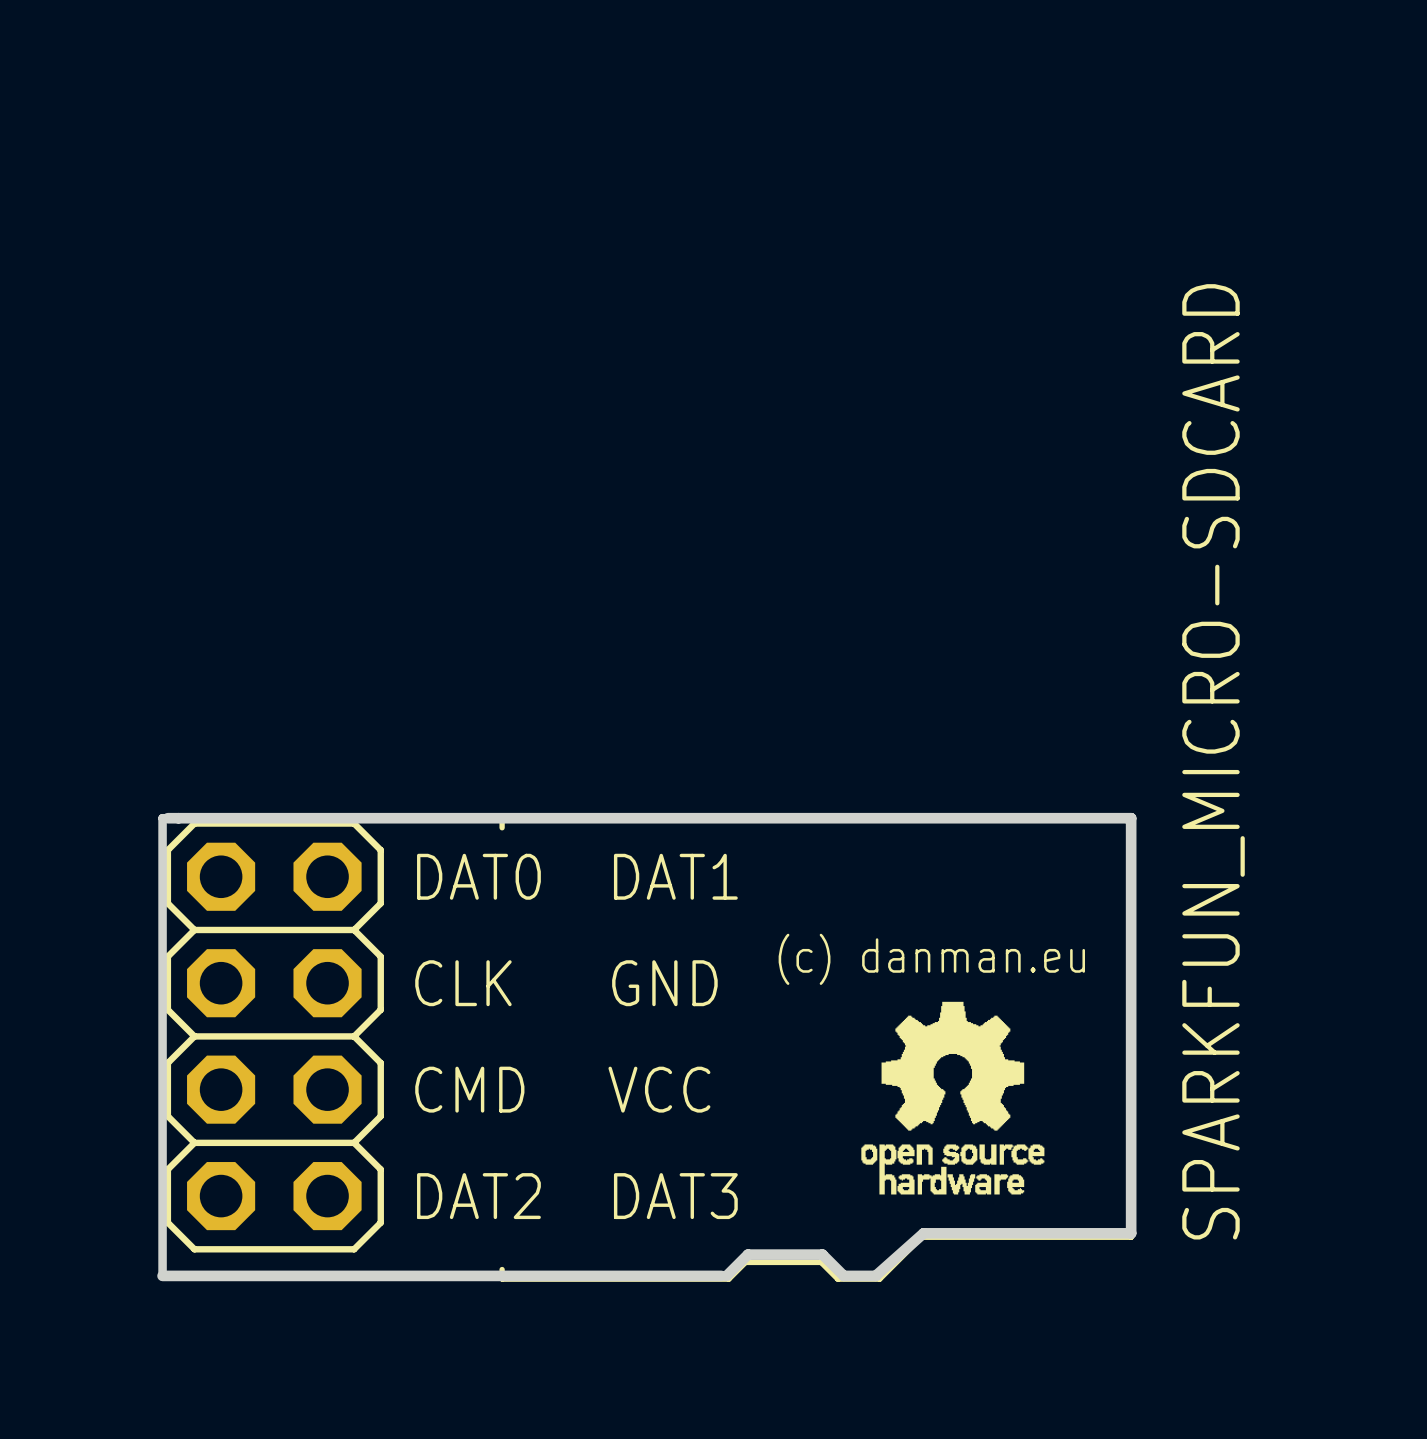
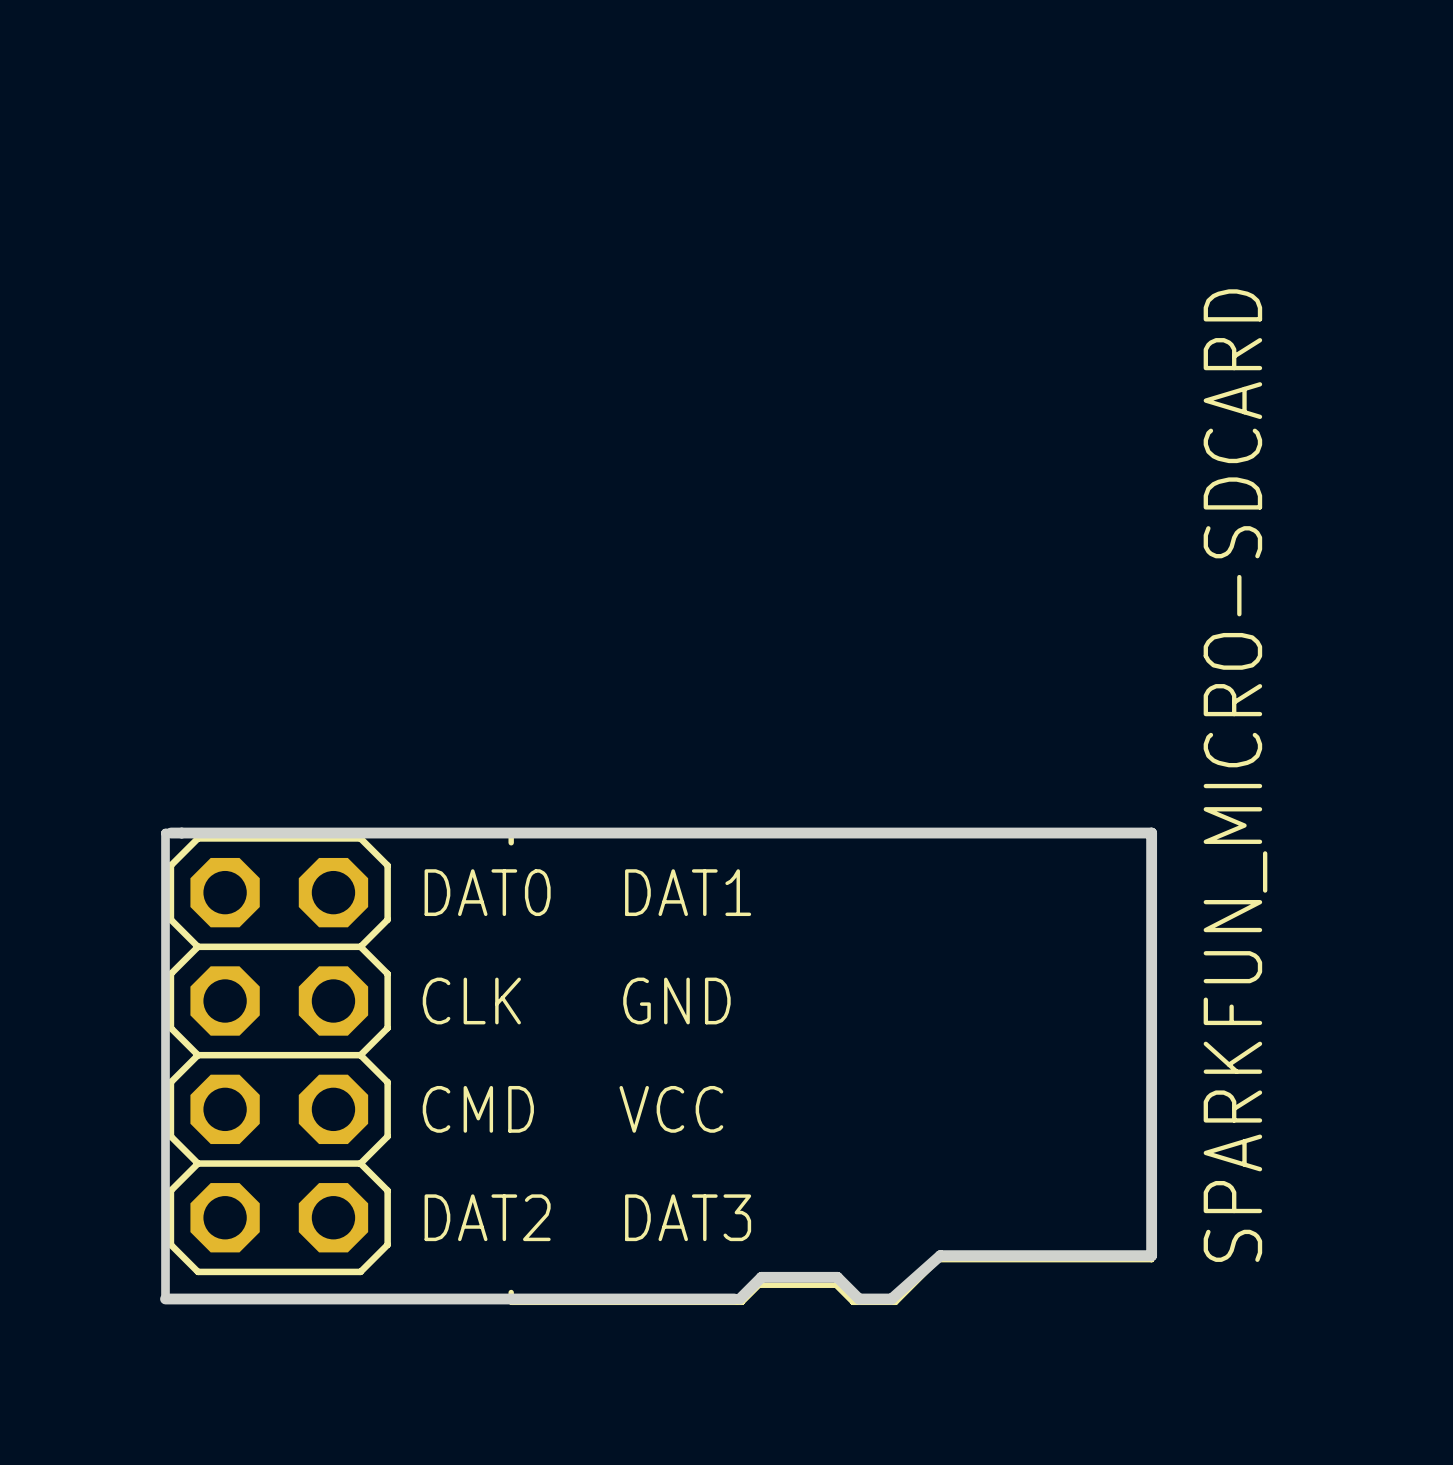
text: (c) danman.eu (931, 959) -> none
drawing: [861, 1001, 1045, 1195] -> none

